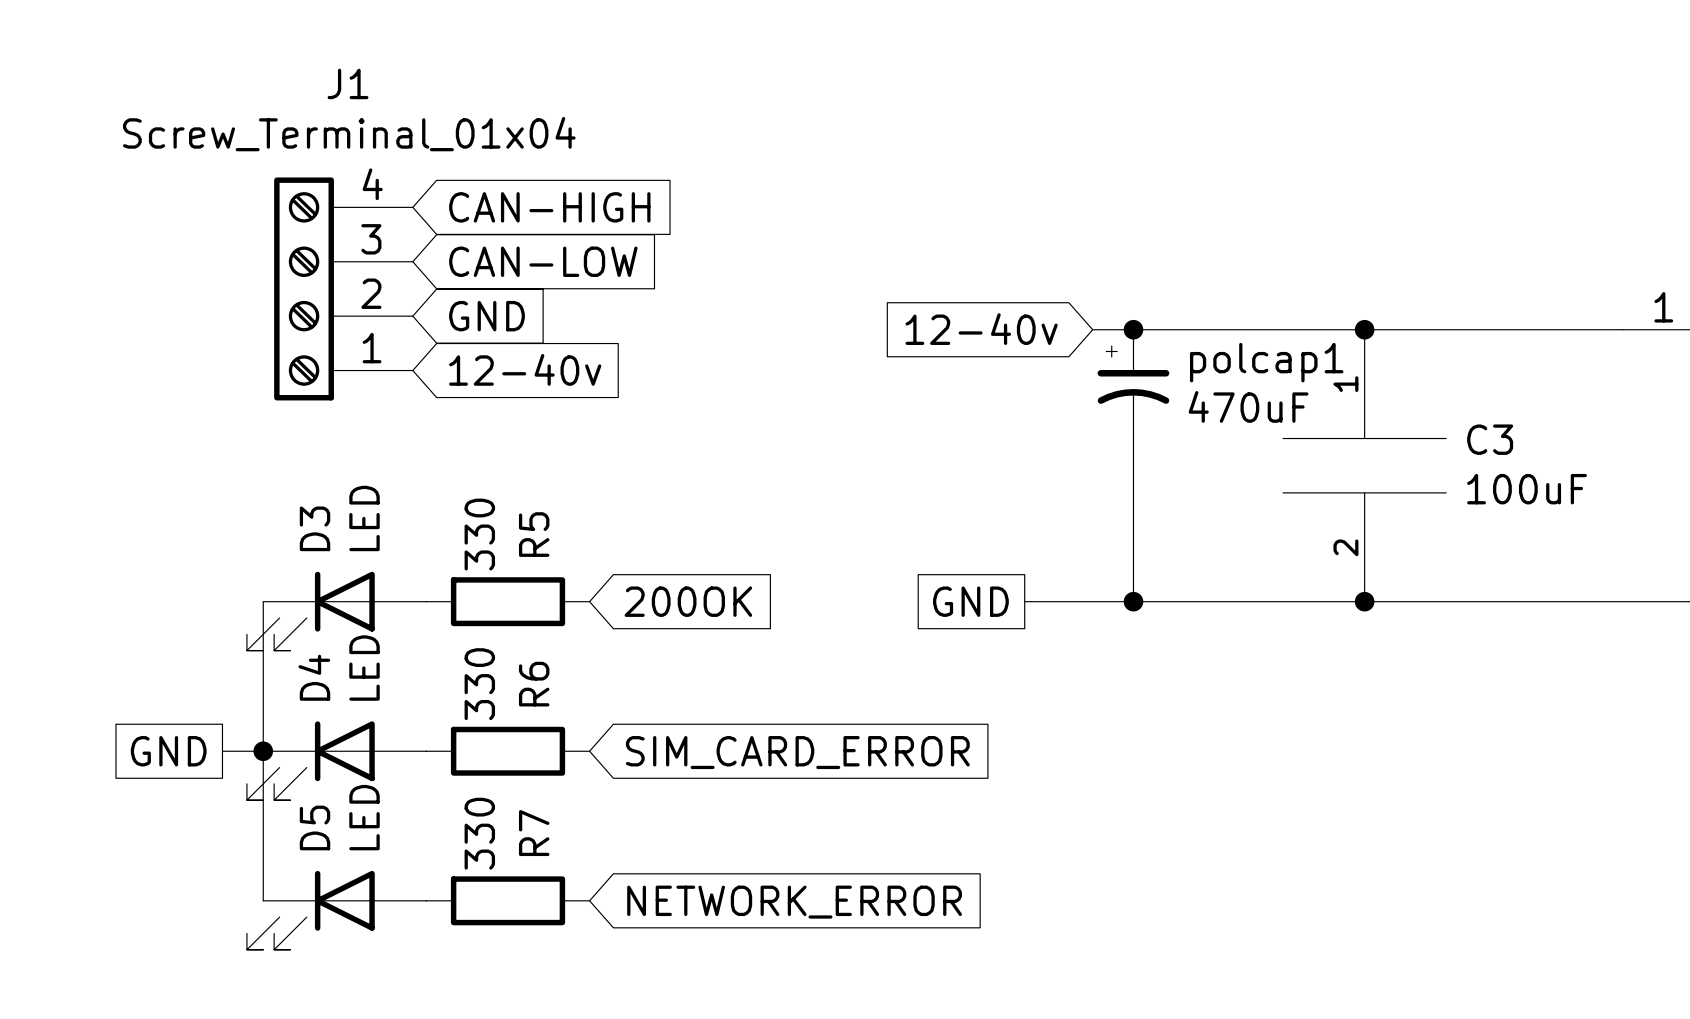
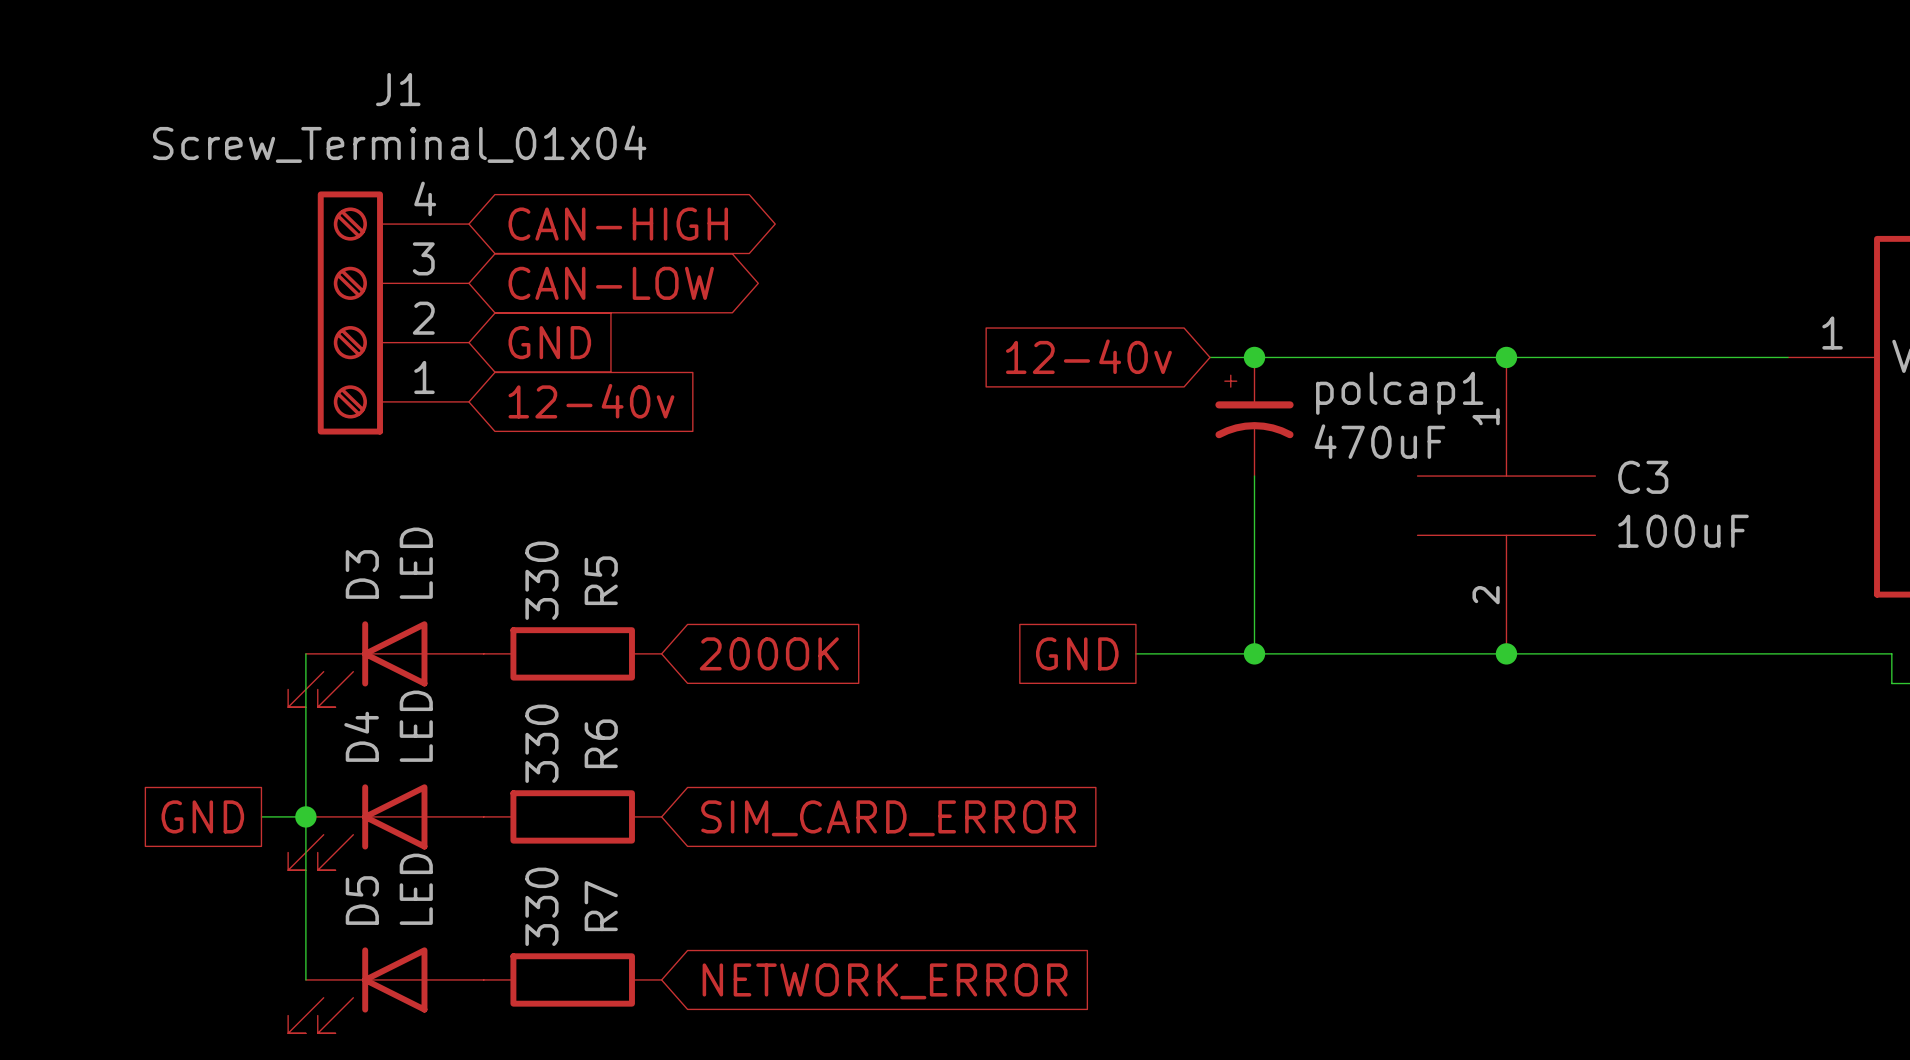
global label shape: input (549, 207) -> bidirectional (618, 224)
global label shape: input (543, 261) -> bidirectional (611, 283)

